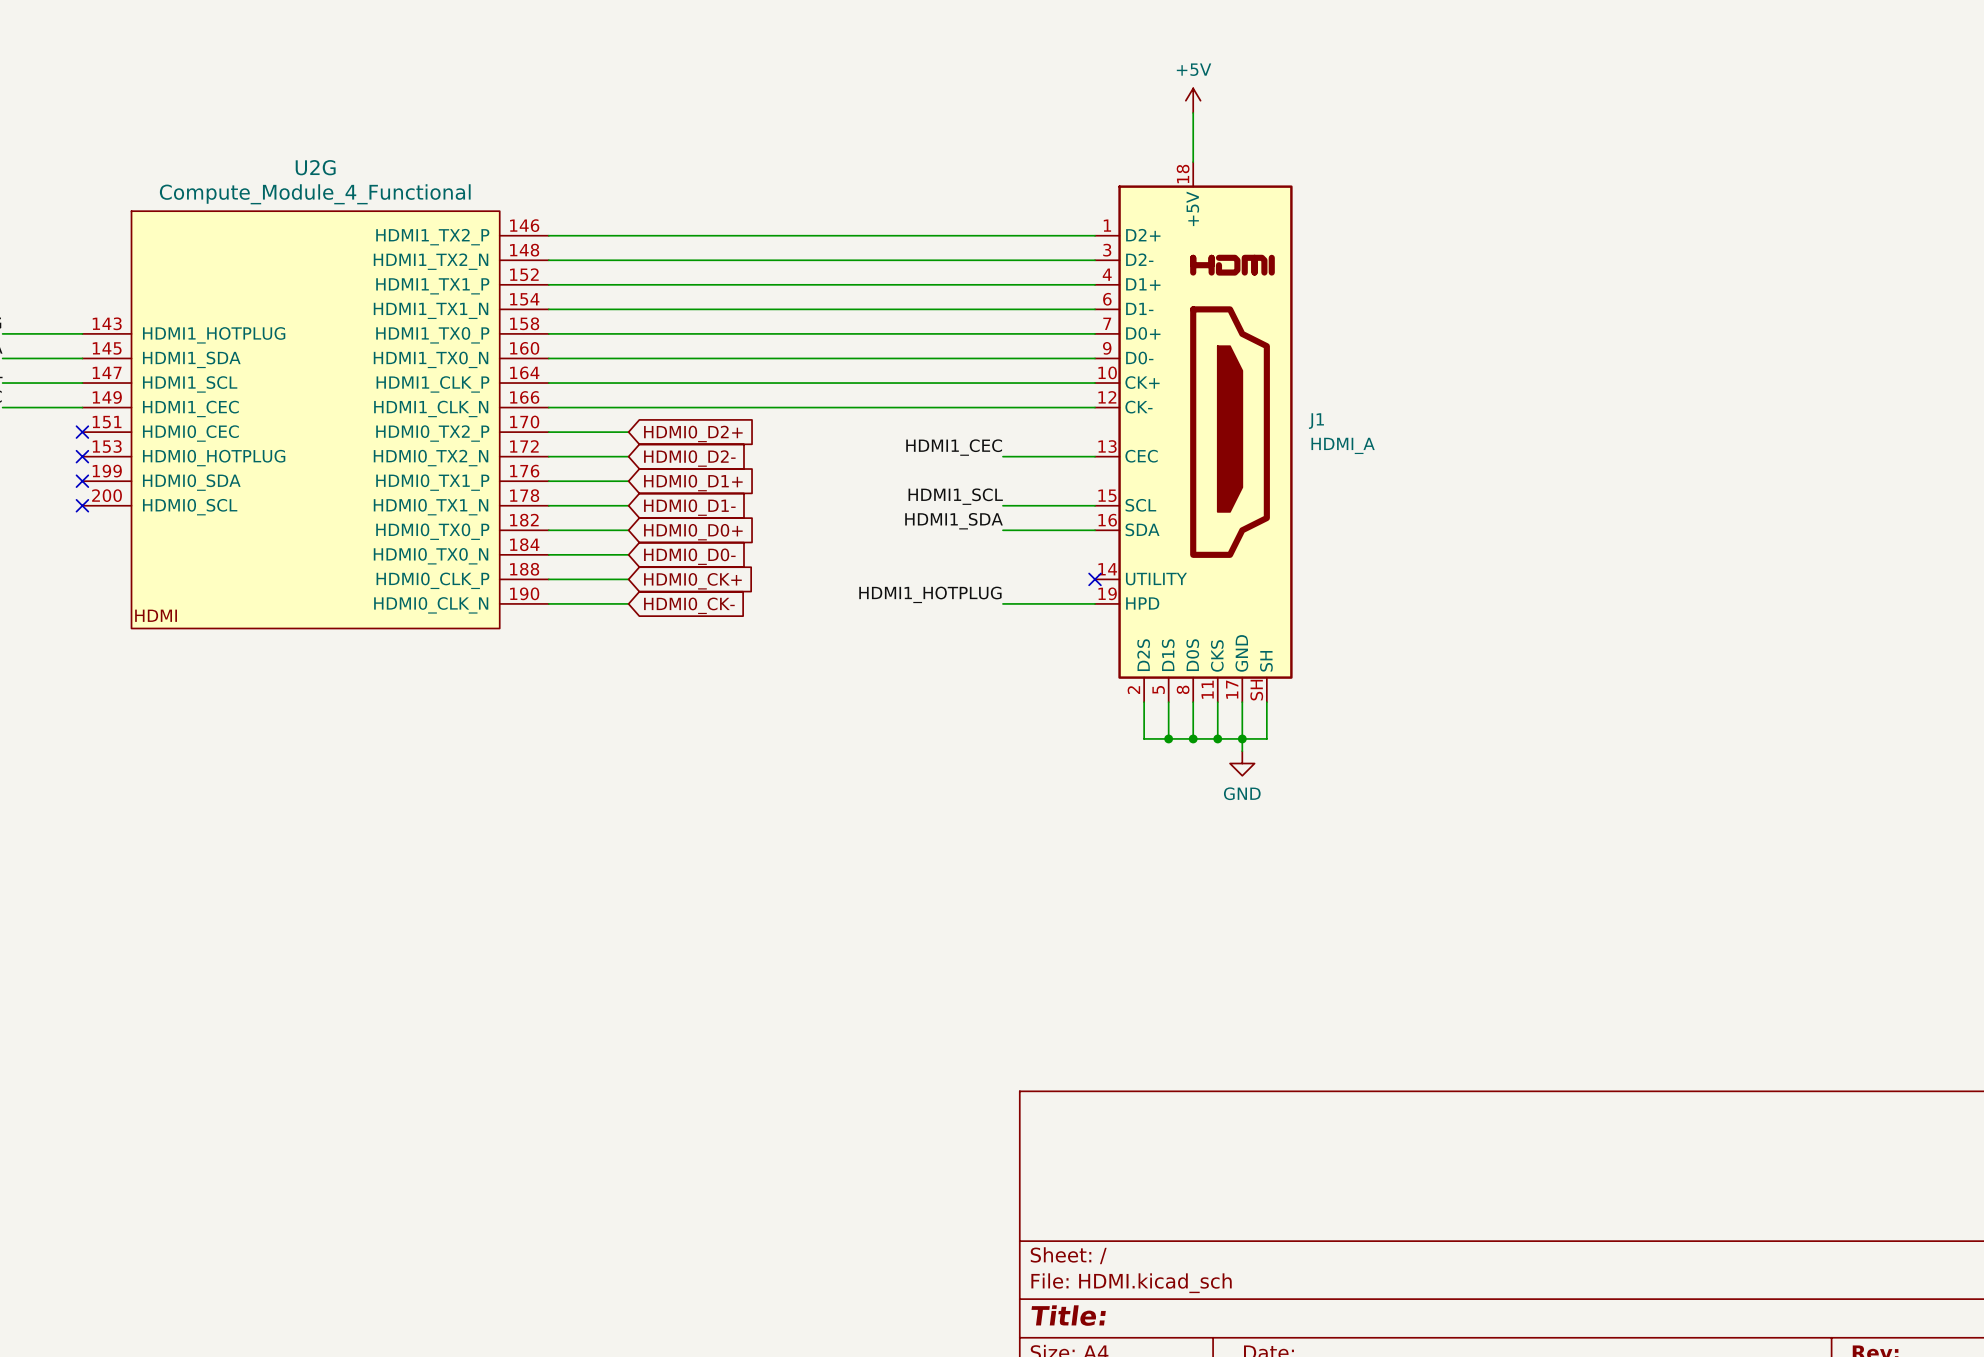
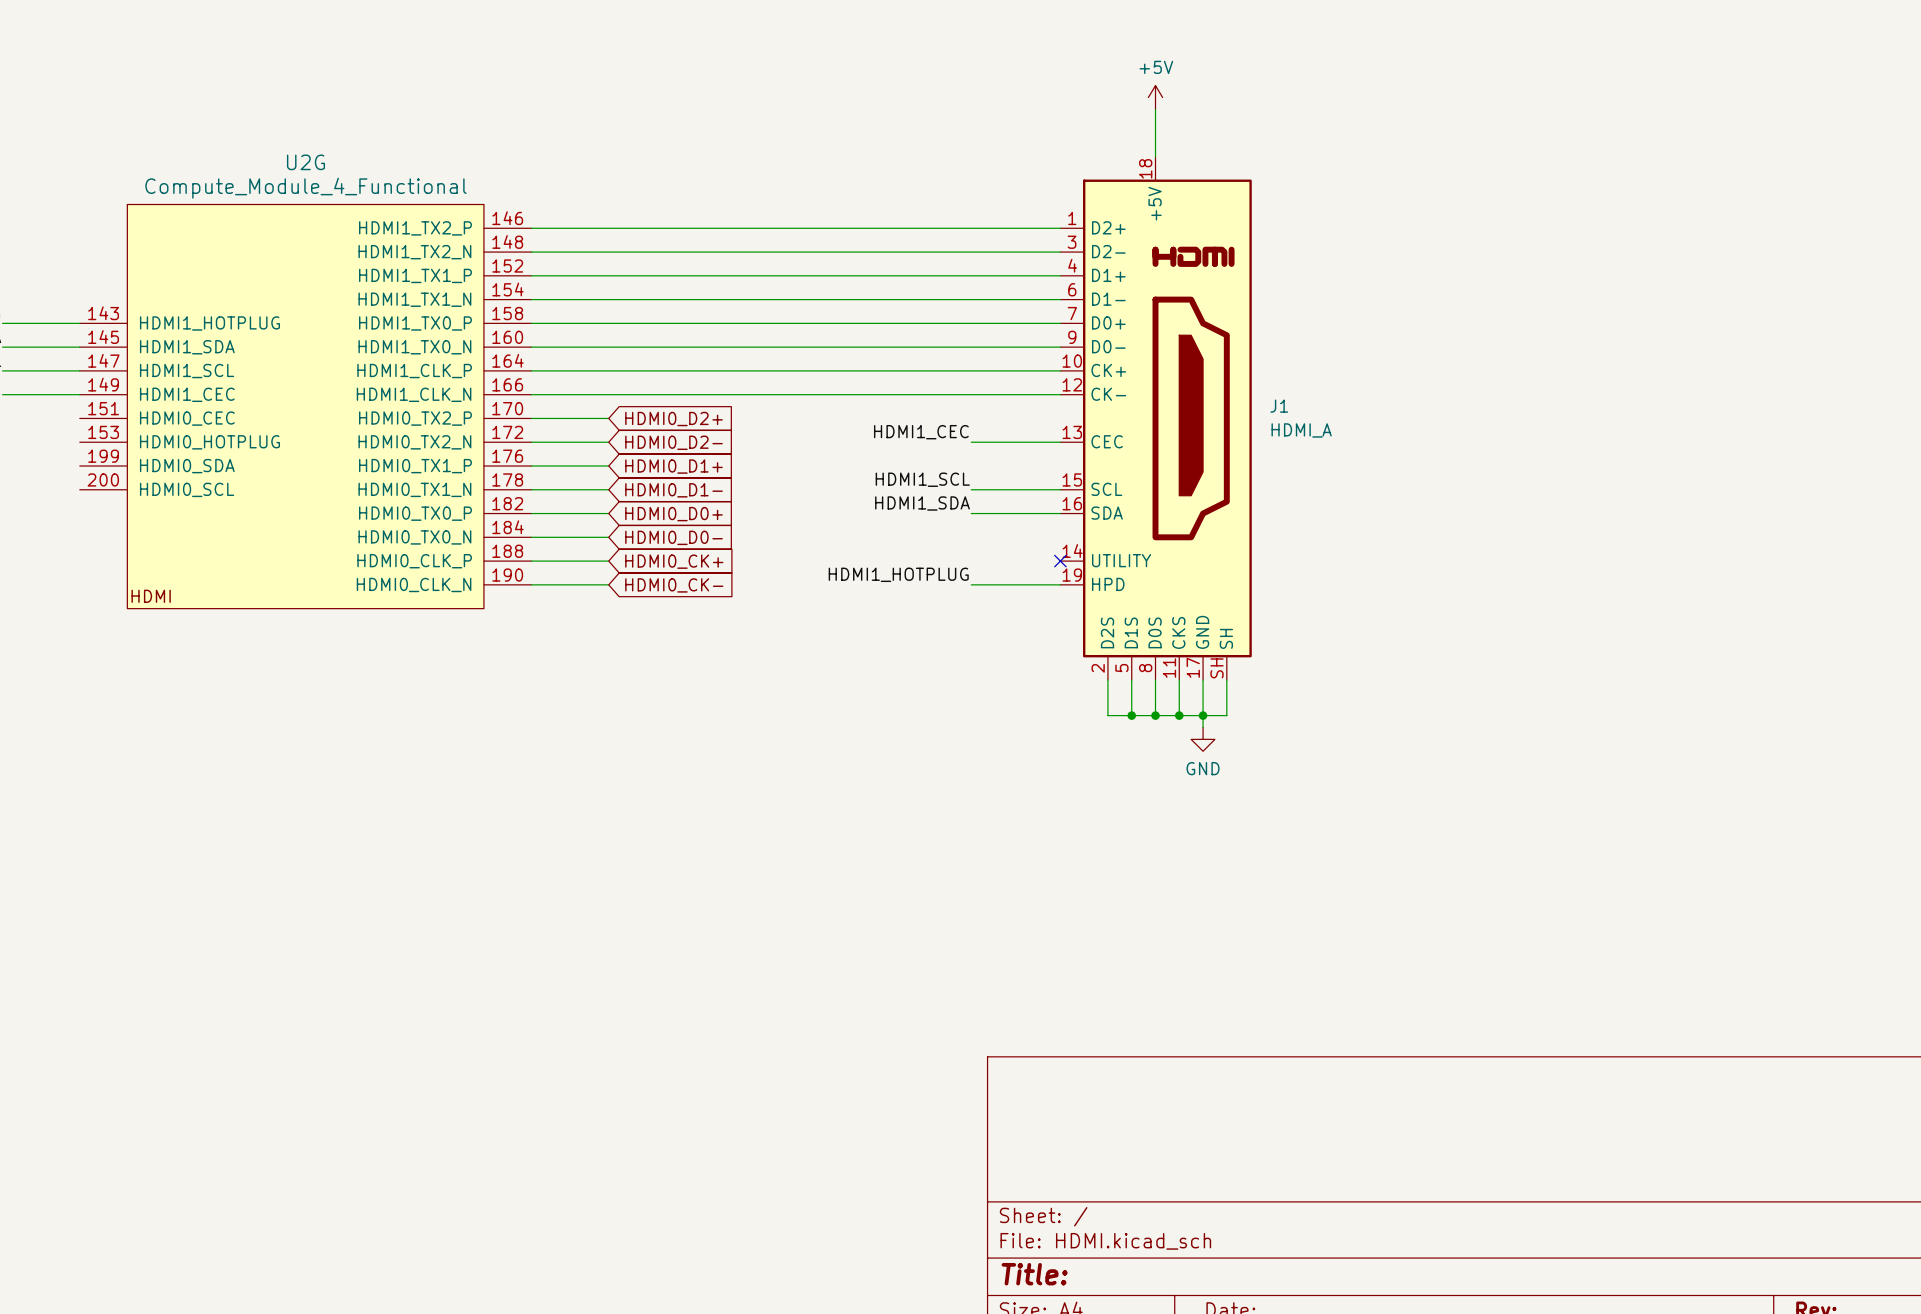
no-connect mark: (82, 432) -> none
no-connect mark: (82, 456) -> none
no-connect mark: (82, 481) -> none
no-connect mark: (82, 505) -> none

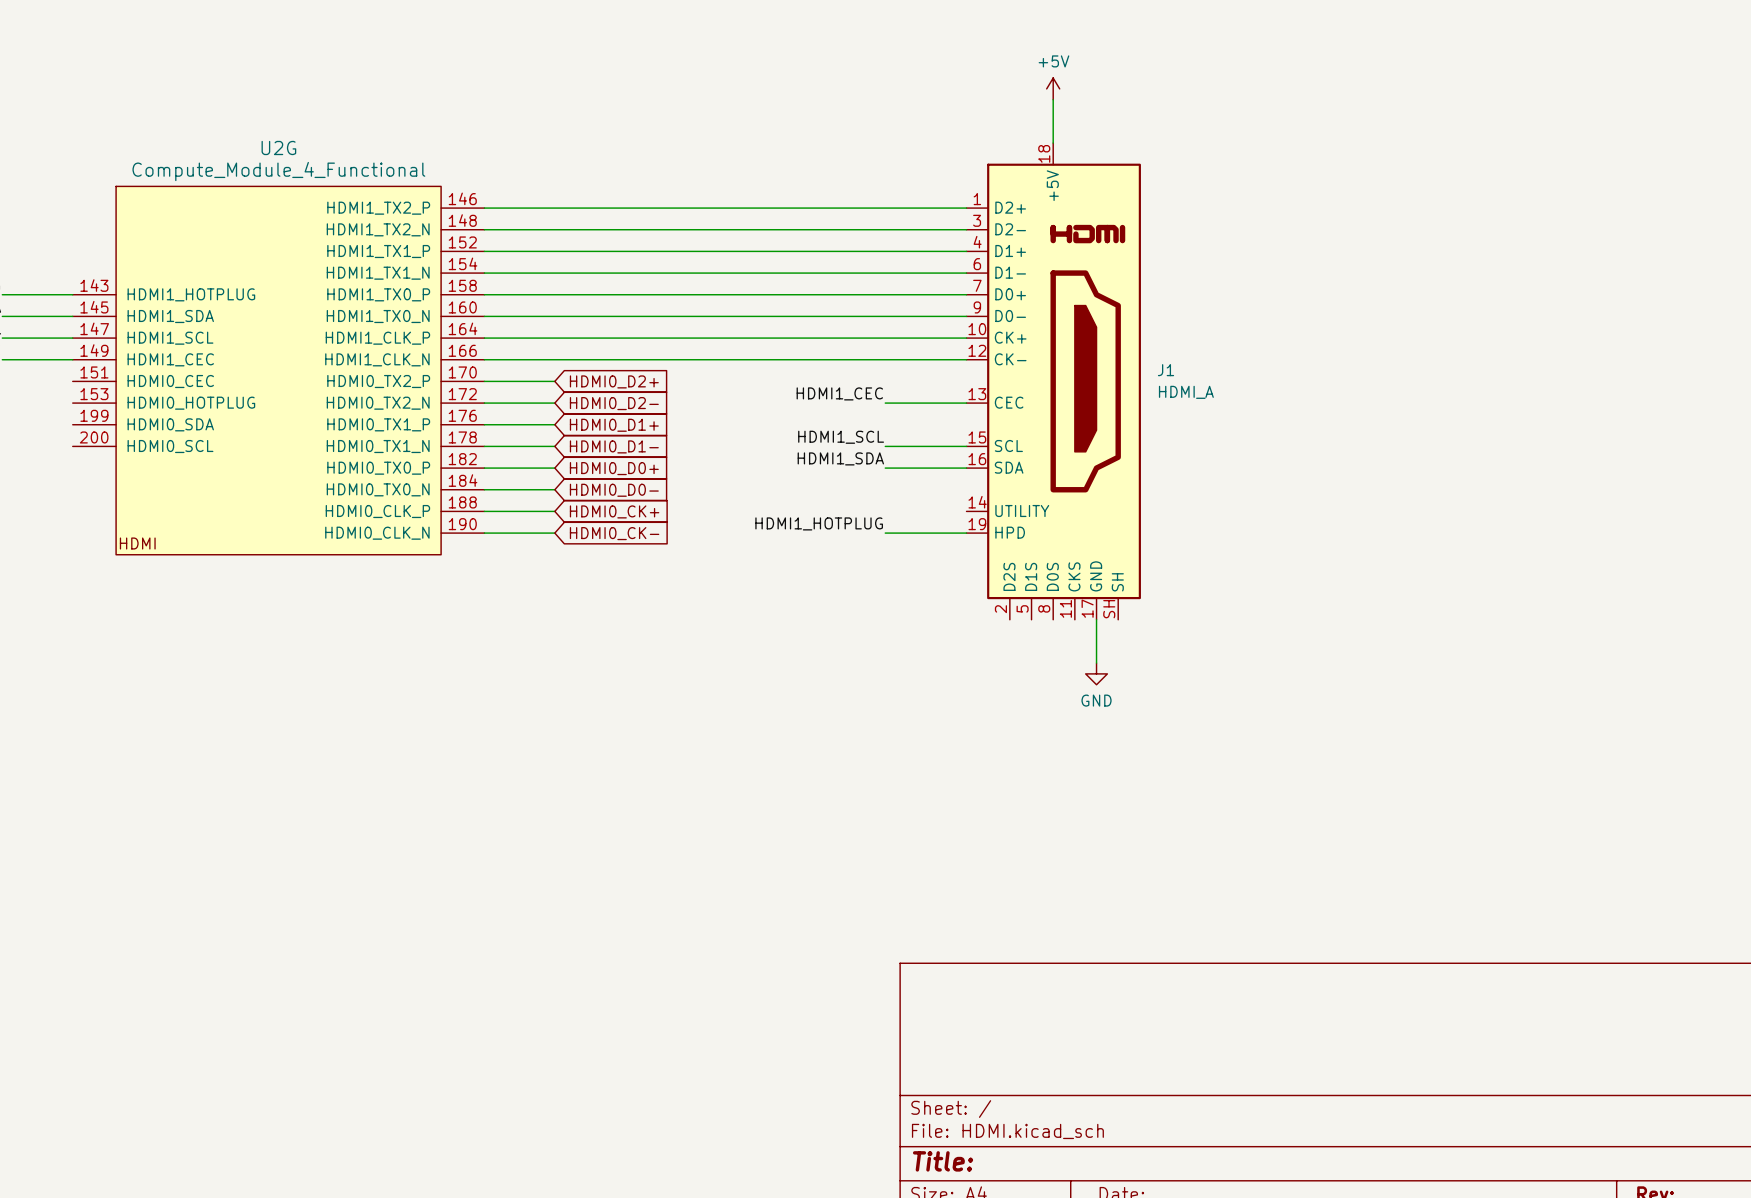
no-connect mark: (1060, 561) -> none
wire: (1107, 679) (1107, 715) (1226, 715) (1226, 679) -> none
wire: (1131, 679) (1131, 715) -> none
wire: (1155, 679) (1155, 715) -> none
wire: (1179, 679) (1179, 715) -> none
junction: (1131, 715) -> none
junction: (1155, 715) -> none
junction: (1179, 715) -> none
junction: (1203, 715) -> none

